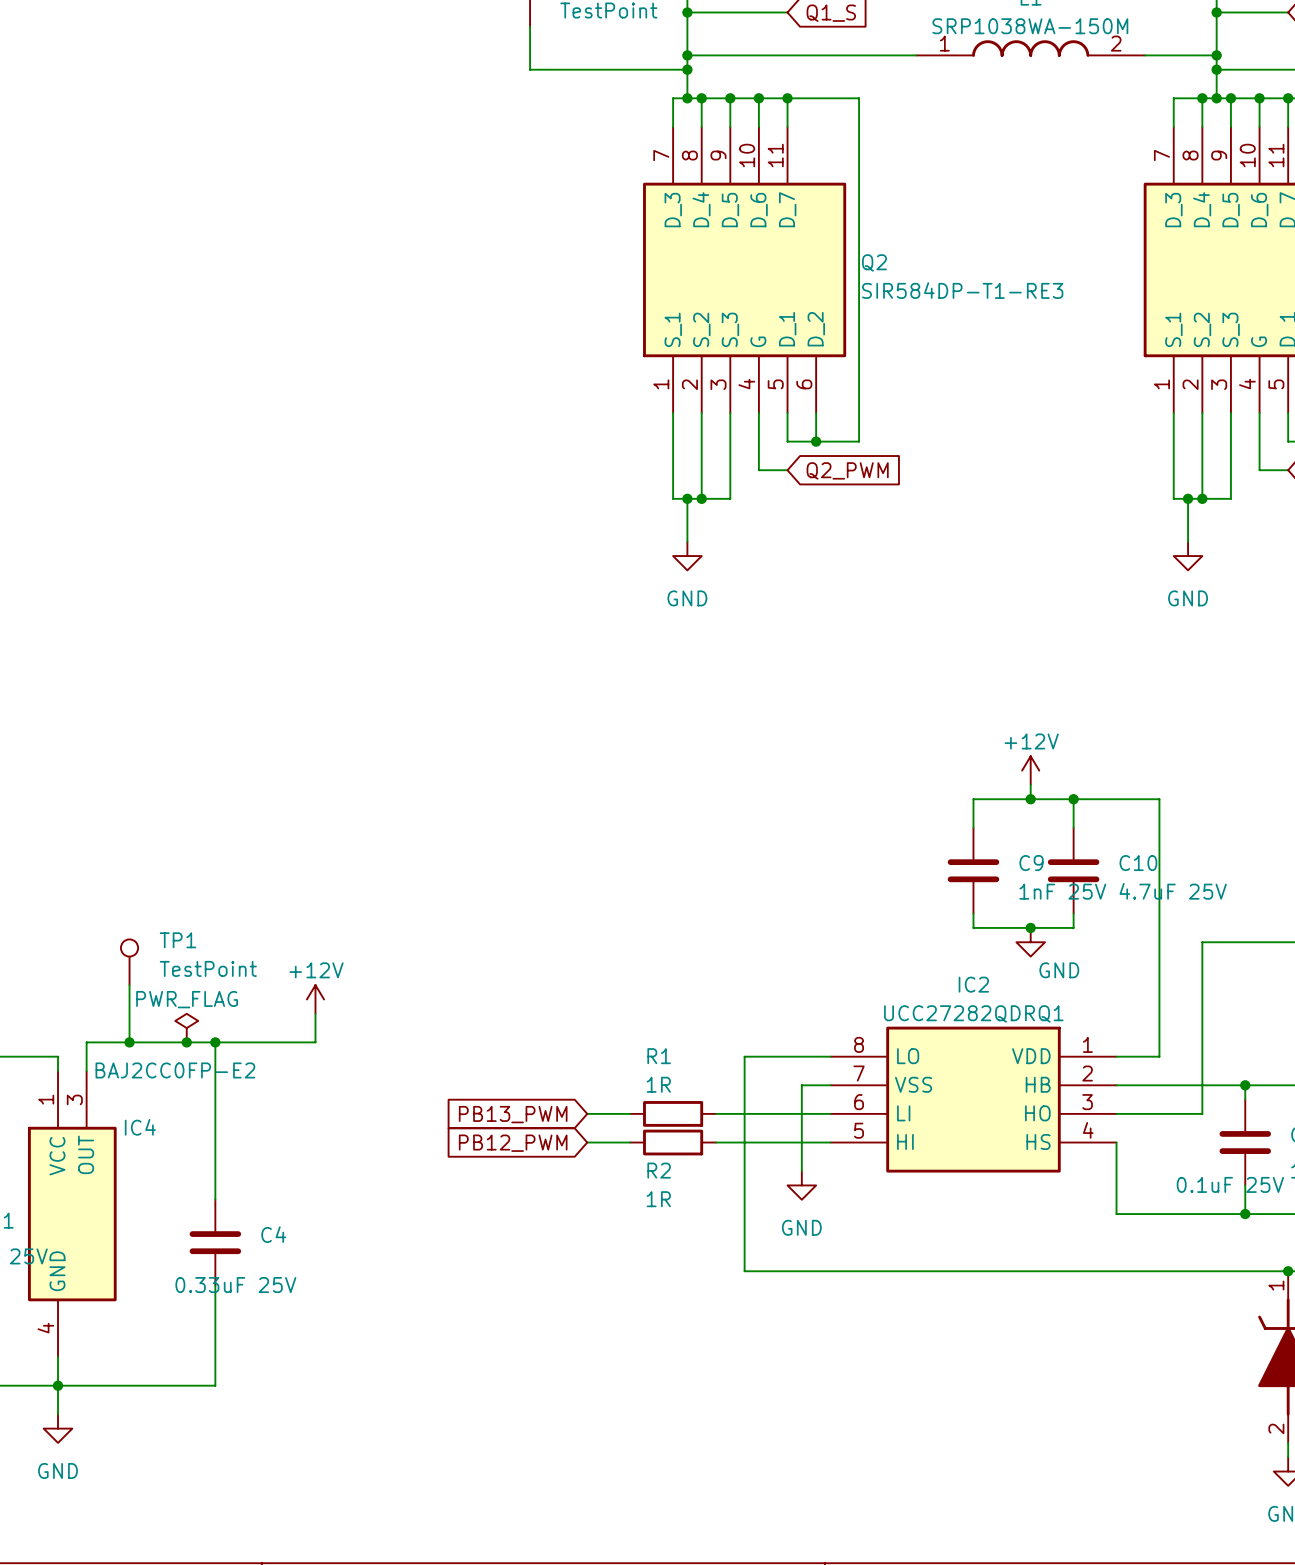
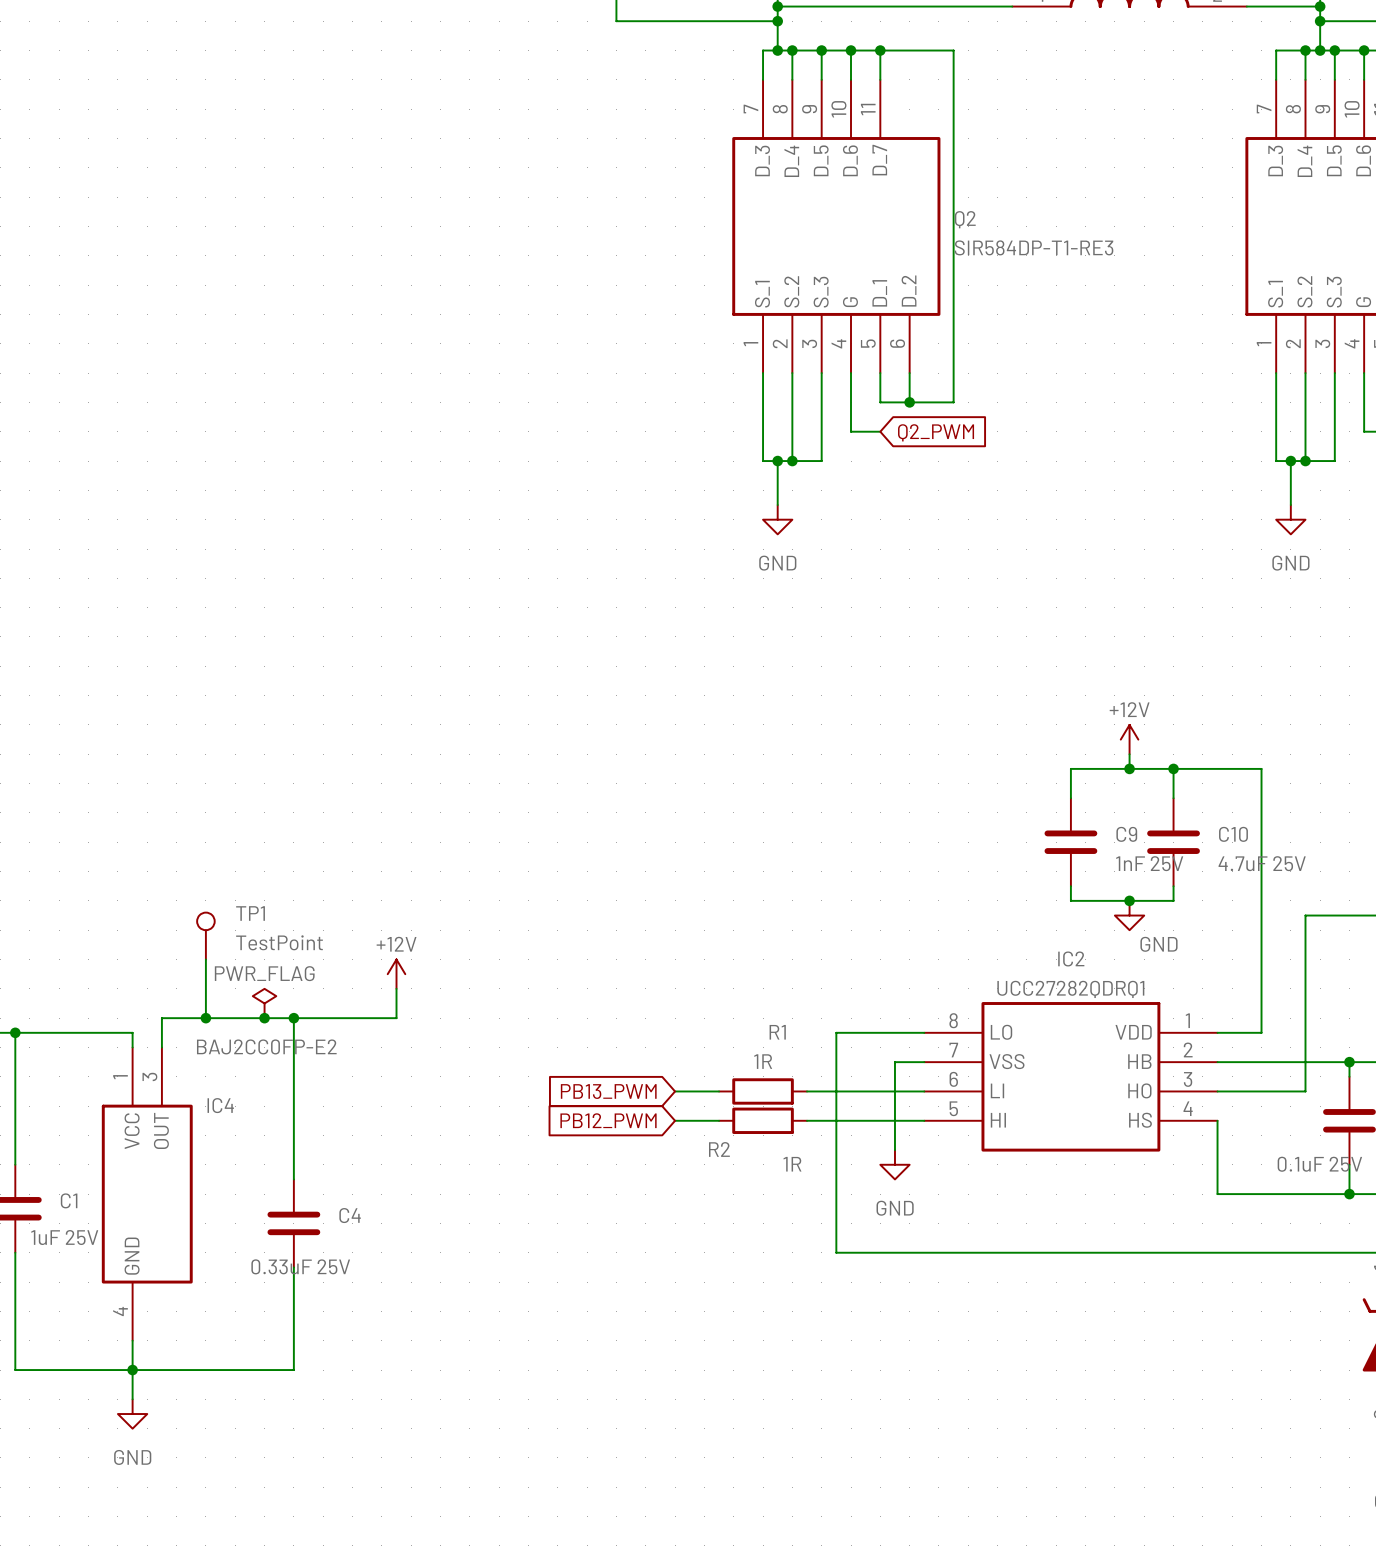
R1 name position: R1 (659, 1056) -> R1 (777, 1032)
R1 value position: 1R (658, 1084) -> 1R (763, 1061)
R2 name position: R2 (659, 1170) -> R2 (719, 1149)
R2 value position: 1R (658, 1199) -> 1R (792, 1164)

